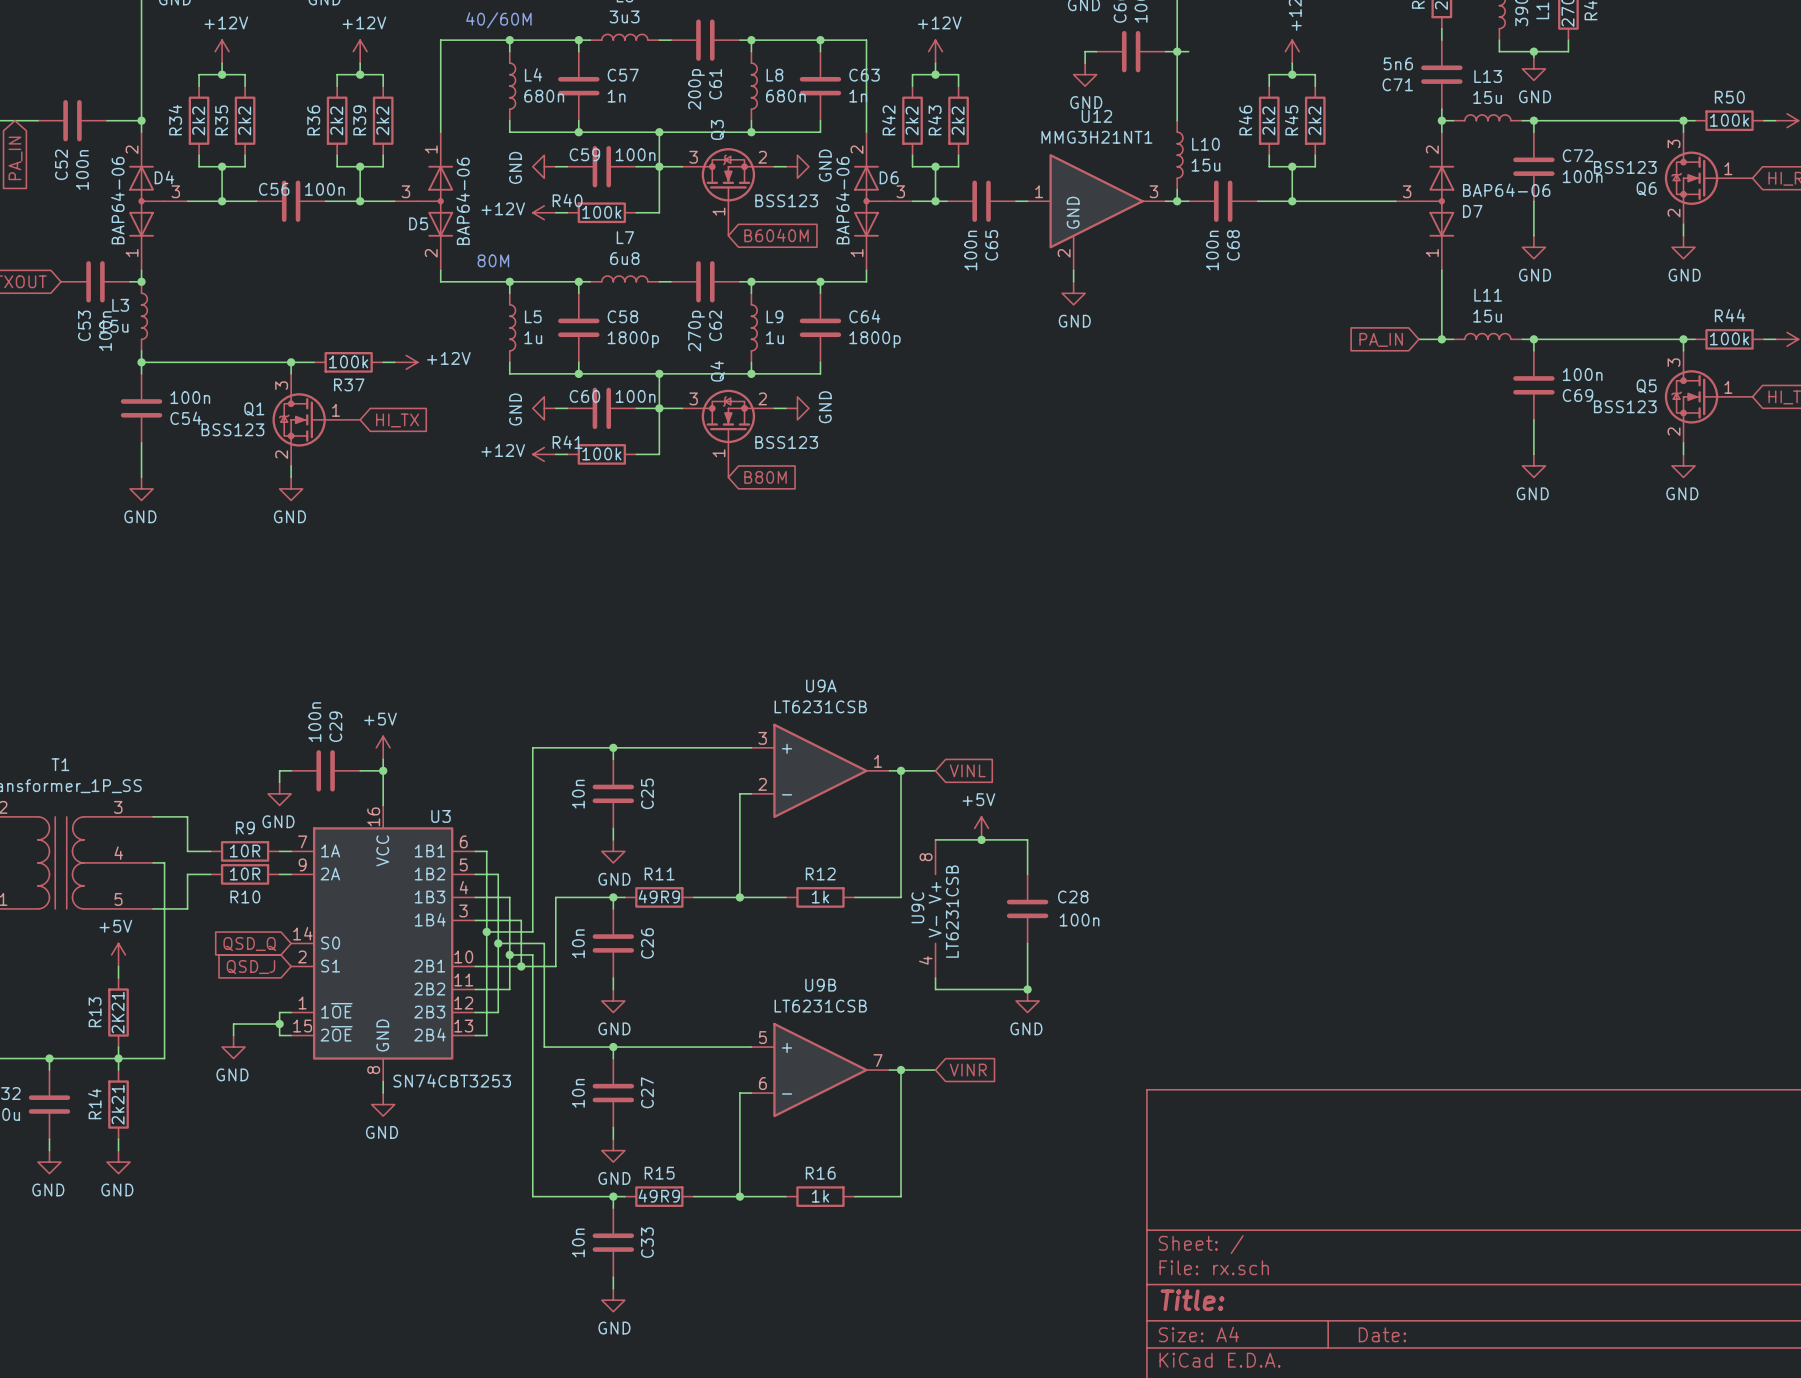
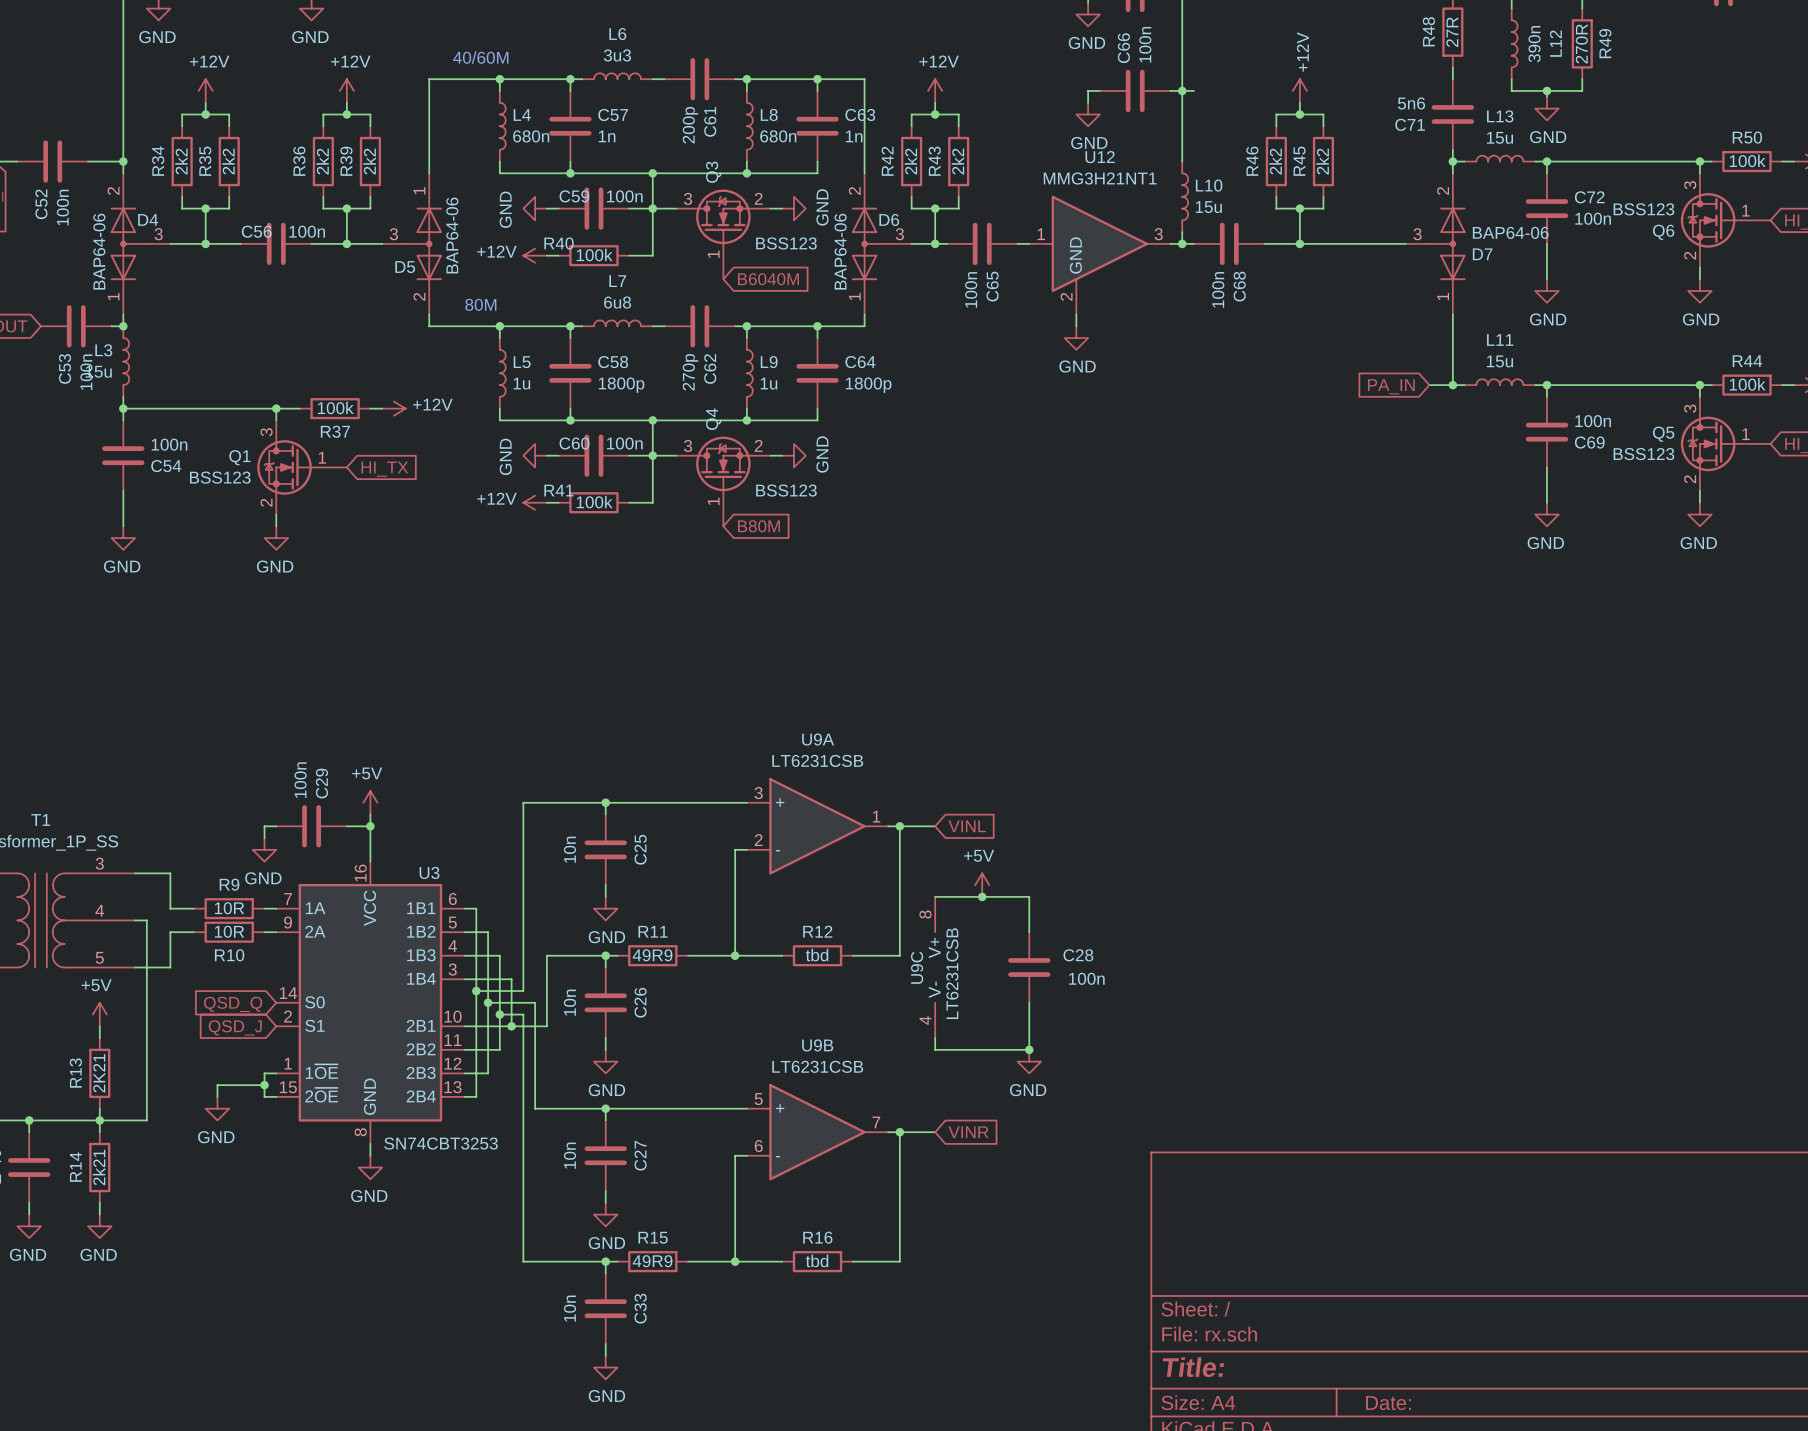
R12 value: 1k (820, 897) -> tbd (817, 955)
R16 value: 1k (820, 1196) -> tbd (817, 1260)

